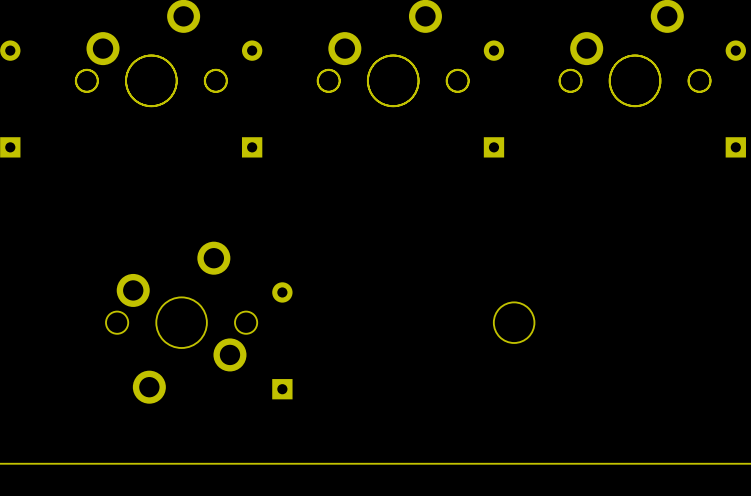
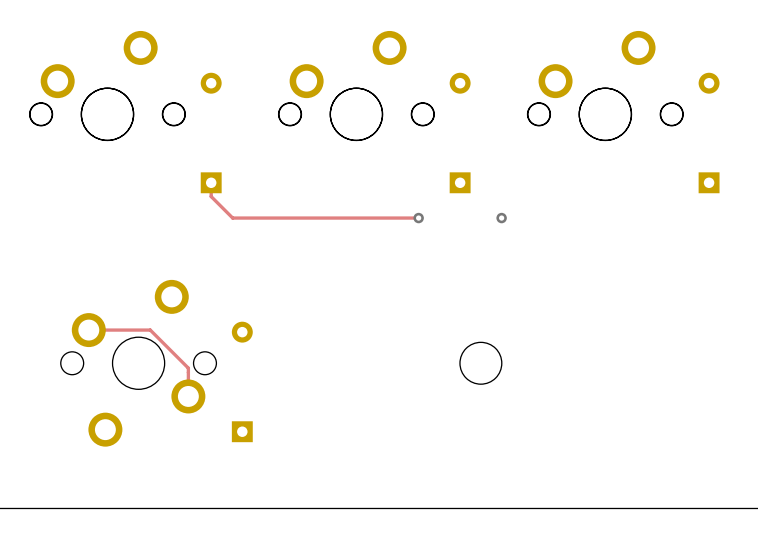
track: none -> (211, 182) (211, 196) (232, 218) (418, 218)
via: none -> (418, 218)
via: none -> (501, 218)
track: none -> (88, 330) (150, 330) (188, 368) (188, 396)

